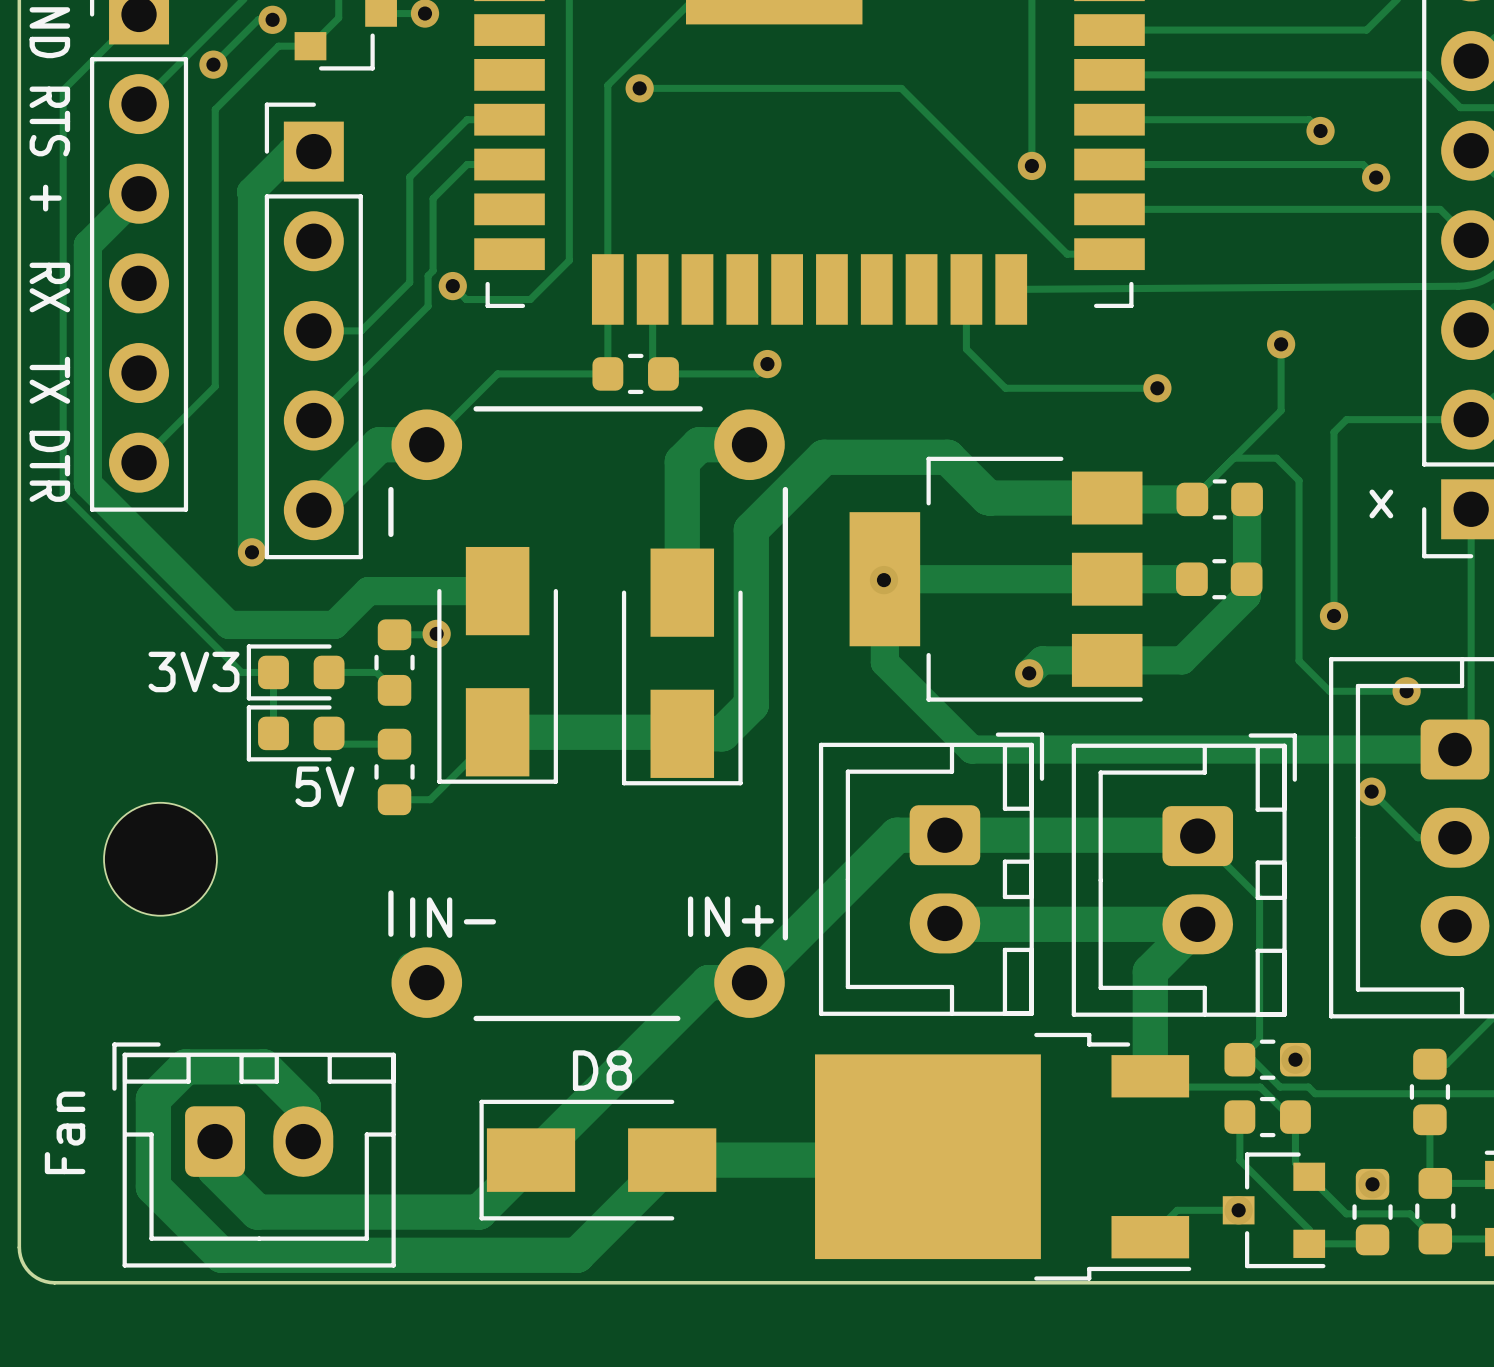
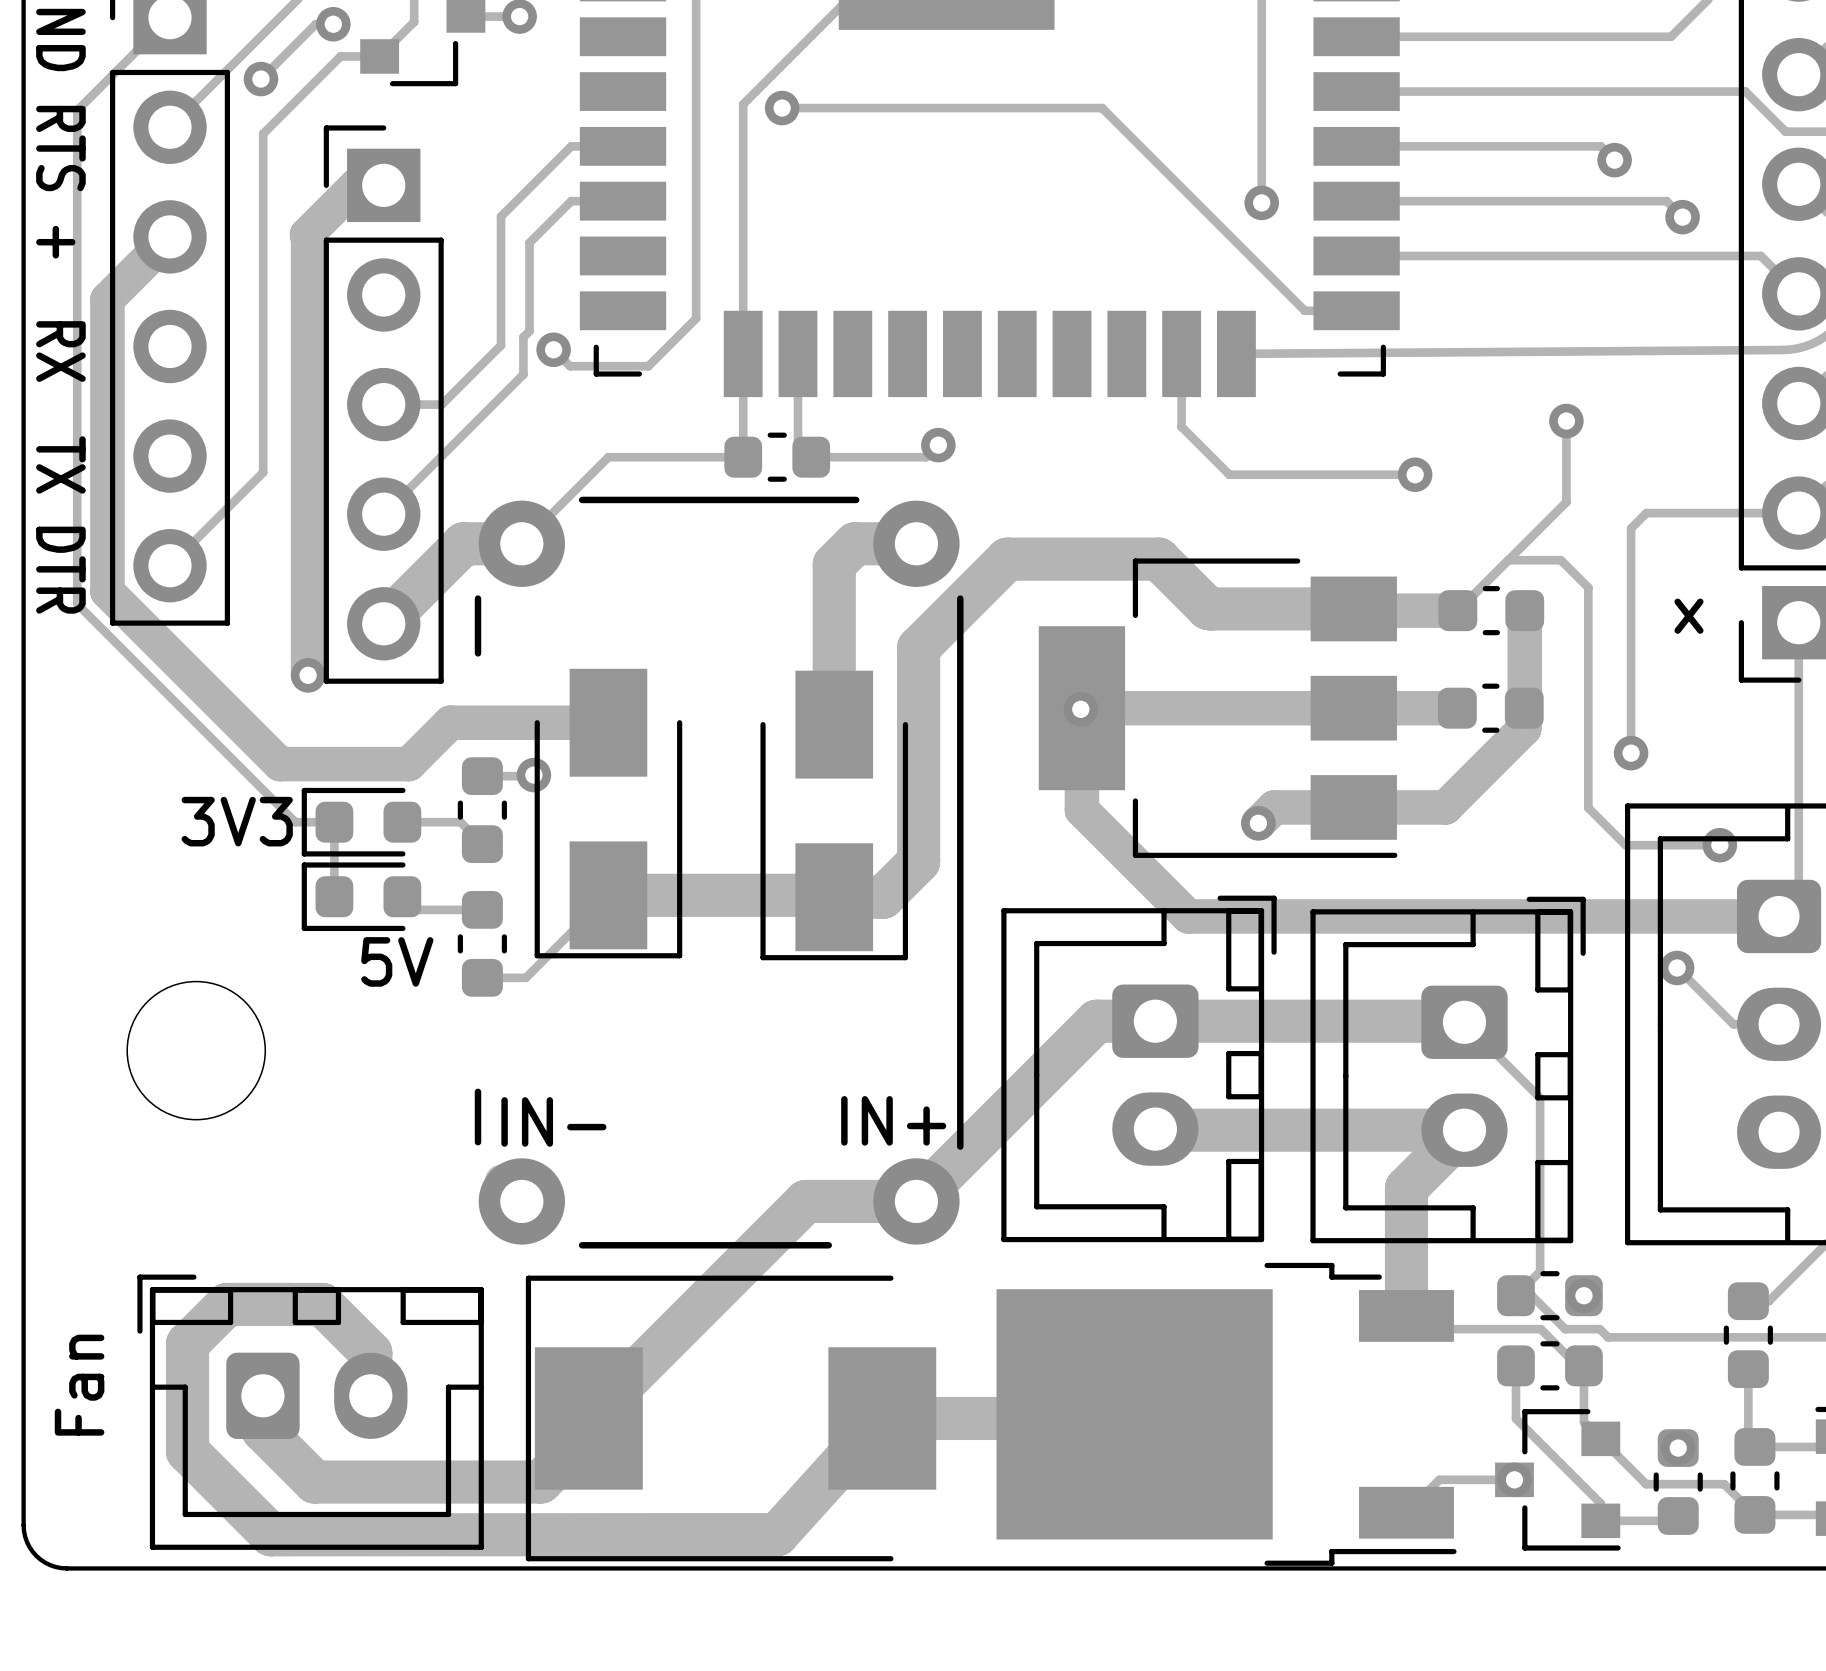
track: (708, 982) (479, 1212) (442, 1212) -> (866, 1201) (805, 1201) (588, 1418) (588, 1433) (540, 1482)
D8: (597, 1160) -> none
part: none -> (731, 1418)
track: (721, 1160) (672, 1160) (577, 1255) (221, 1255) -> (882, 1418) (777, 1534) (271, 1534)

